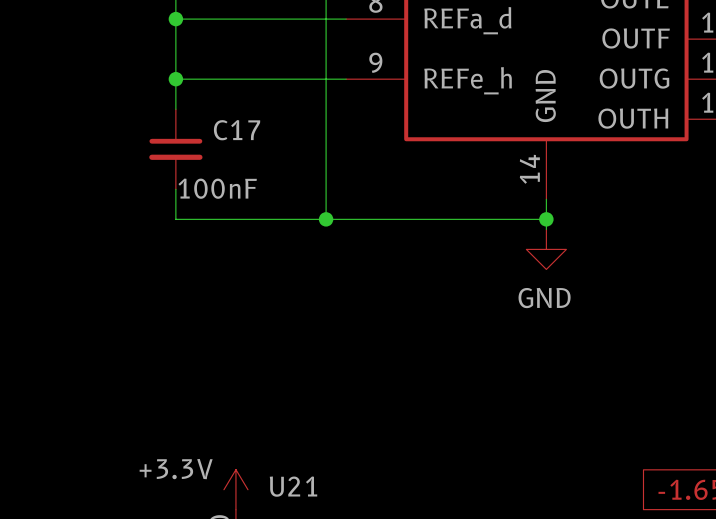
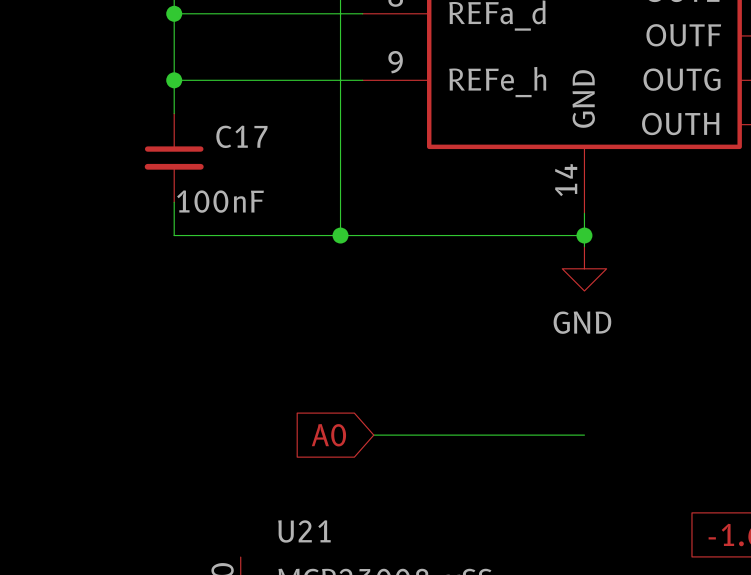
global label: none -> A0 (328, 435)
wire: none -> (373, 435) (584, 435)
power symbol: +3.3V (235, 489) -> none

